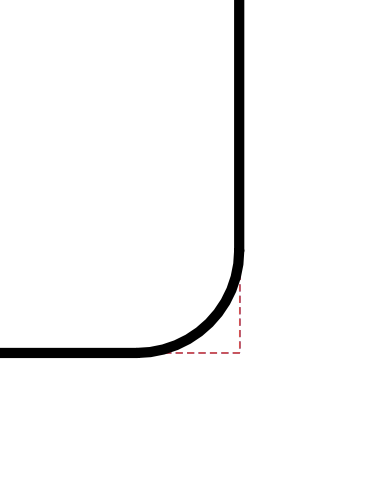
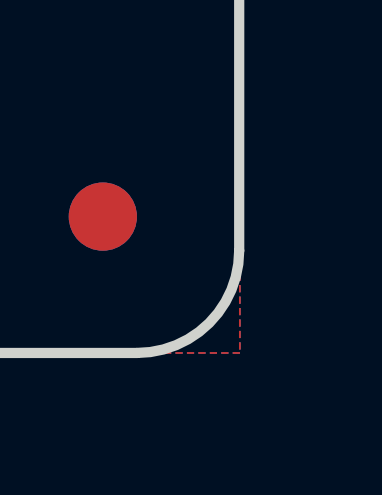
part: none -> (102, 216)

